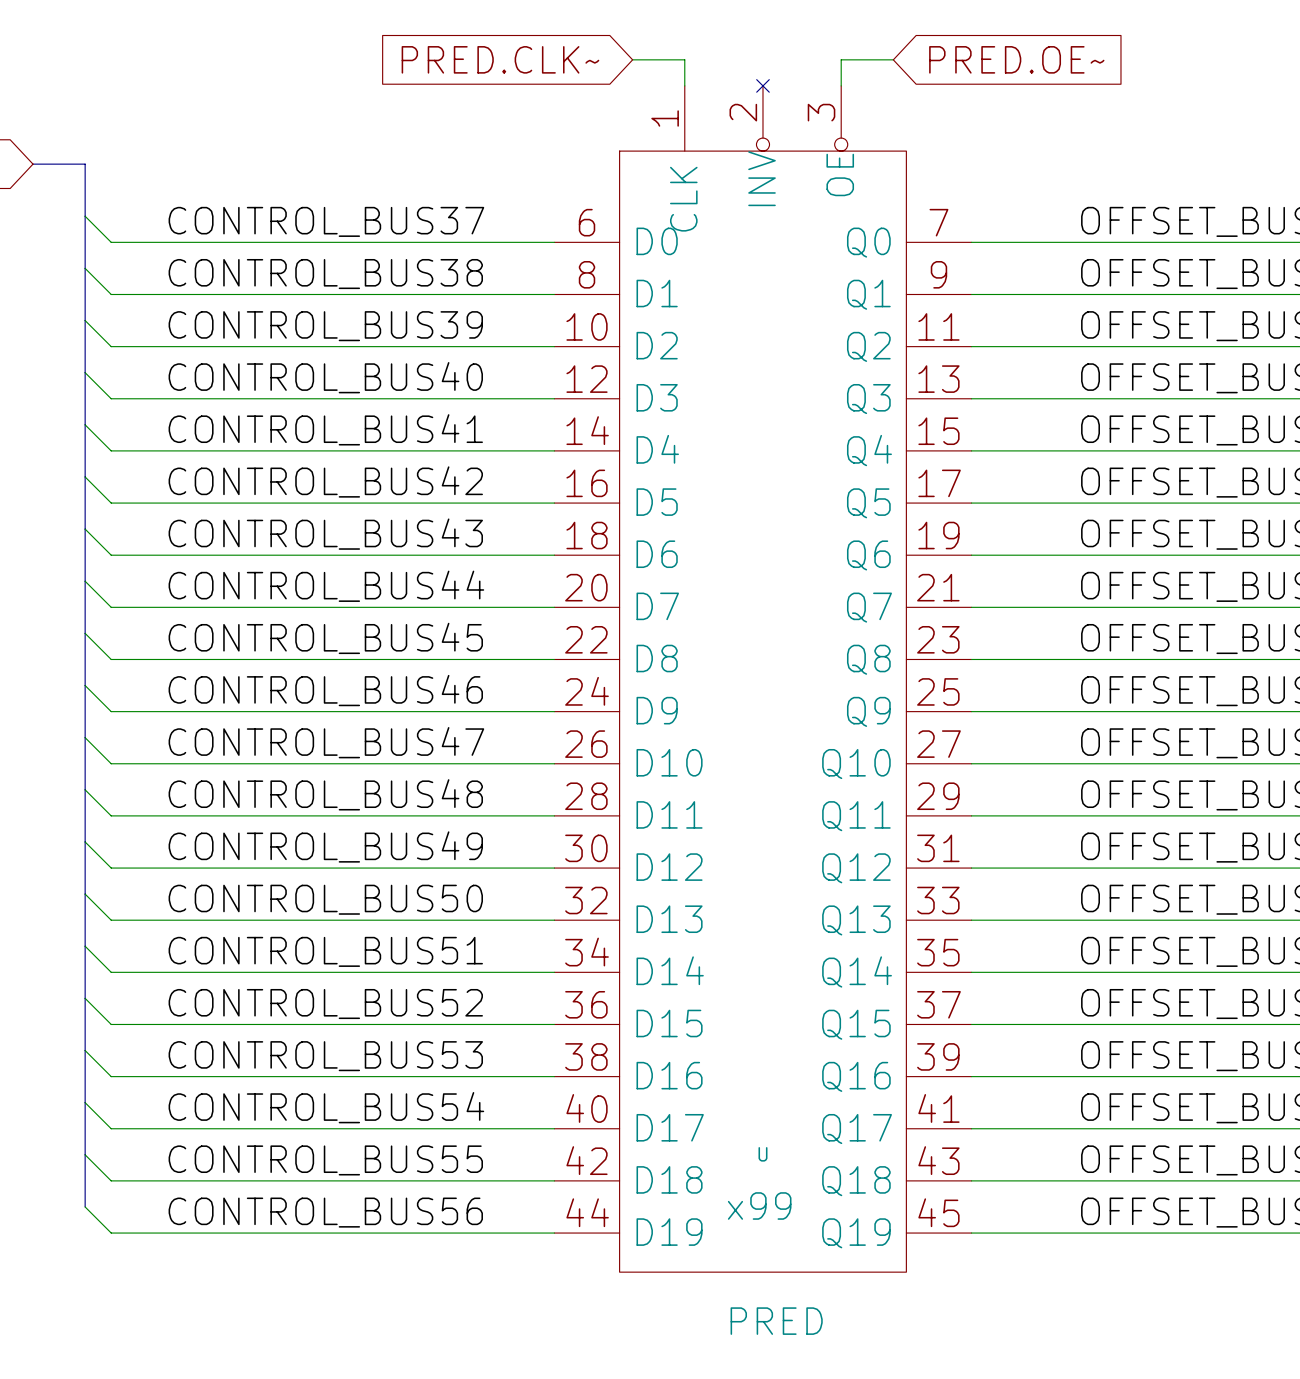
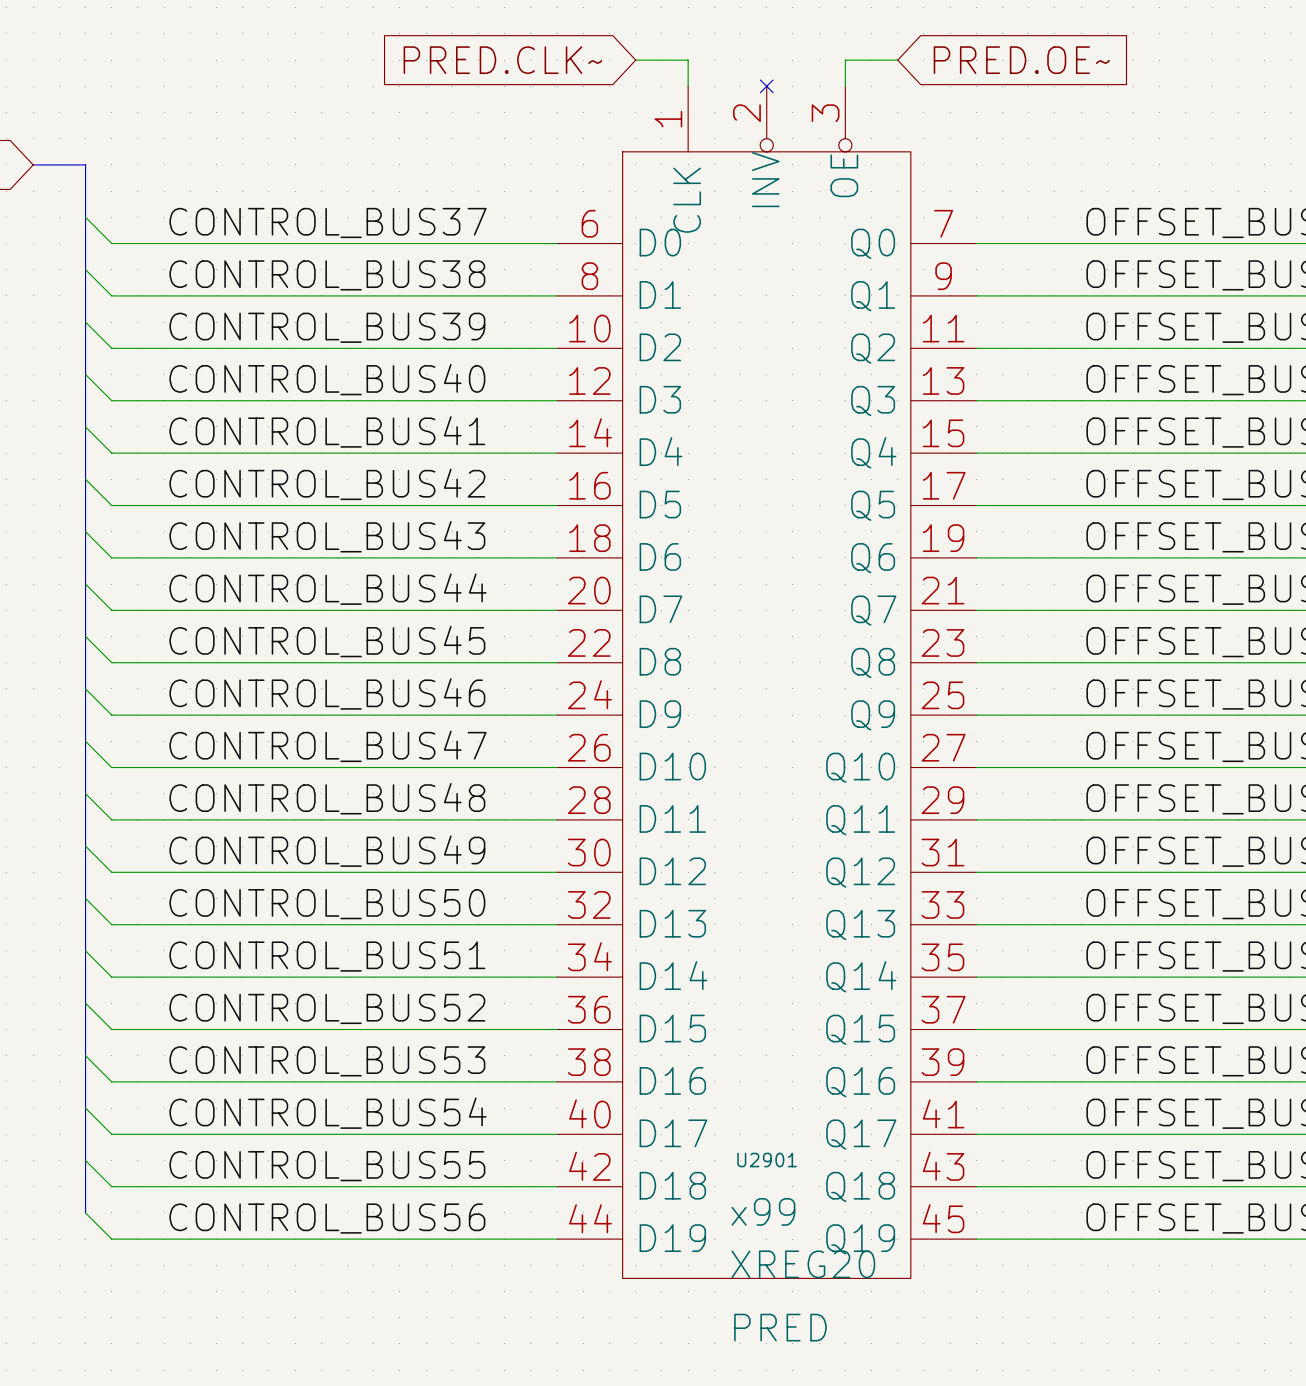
U name: U (762, 1154) -> U2901 (767, 1160)
U value: none -> XREG20 (803, 1264)

